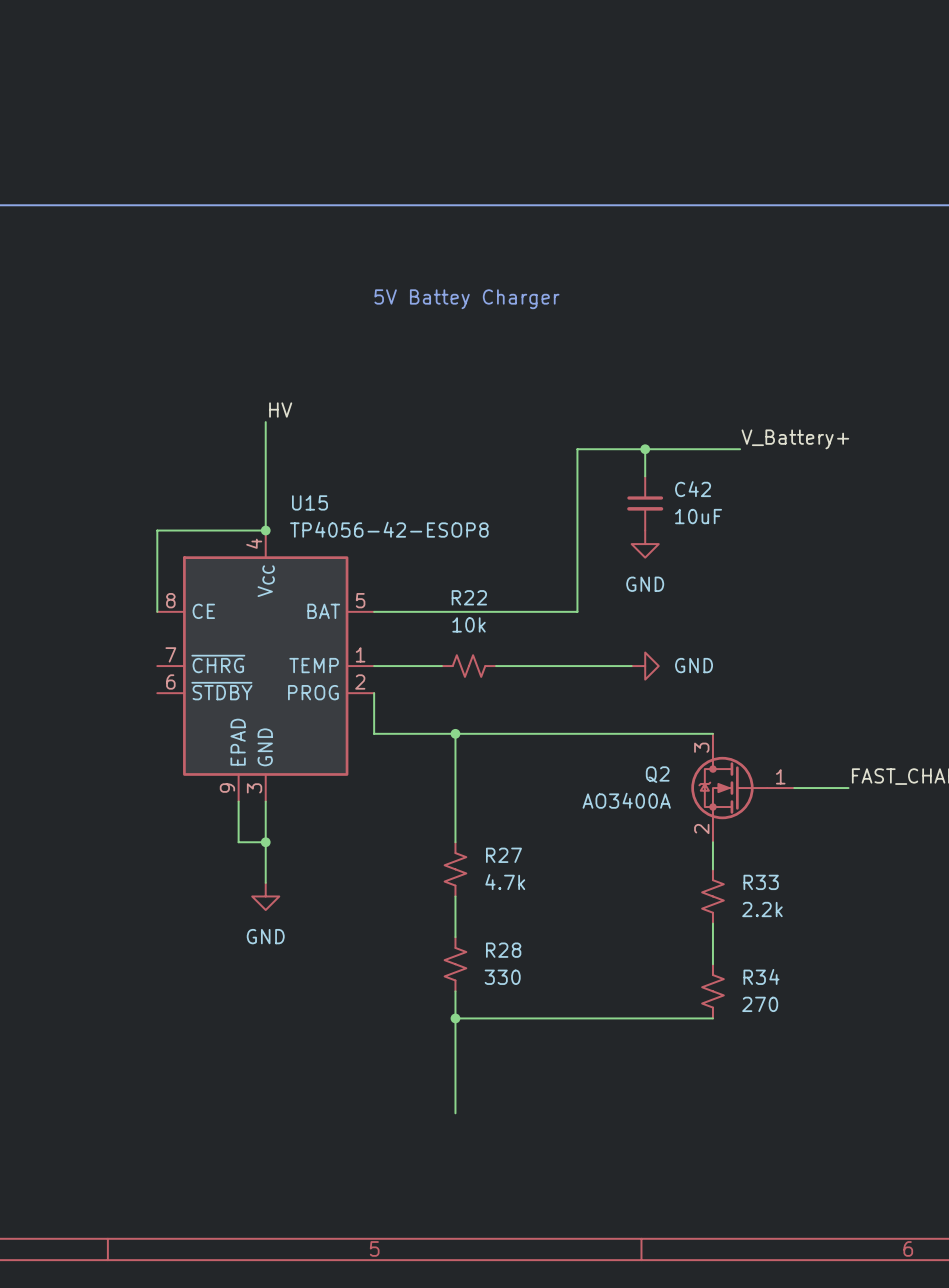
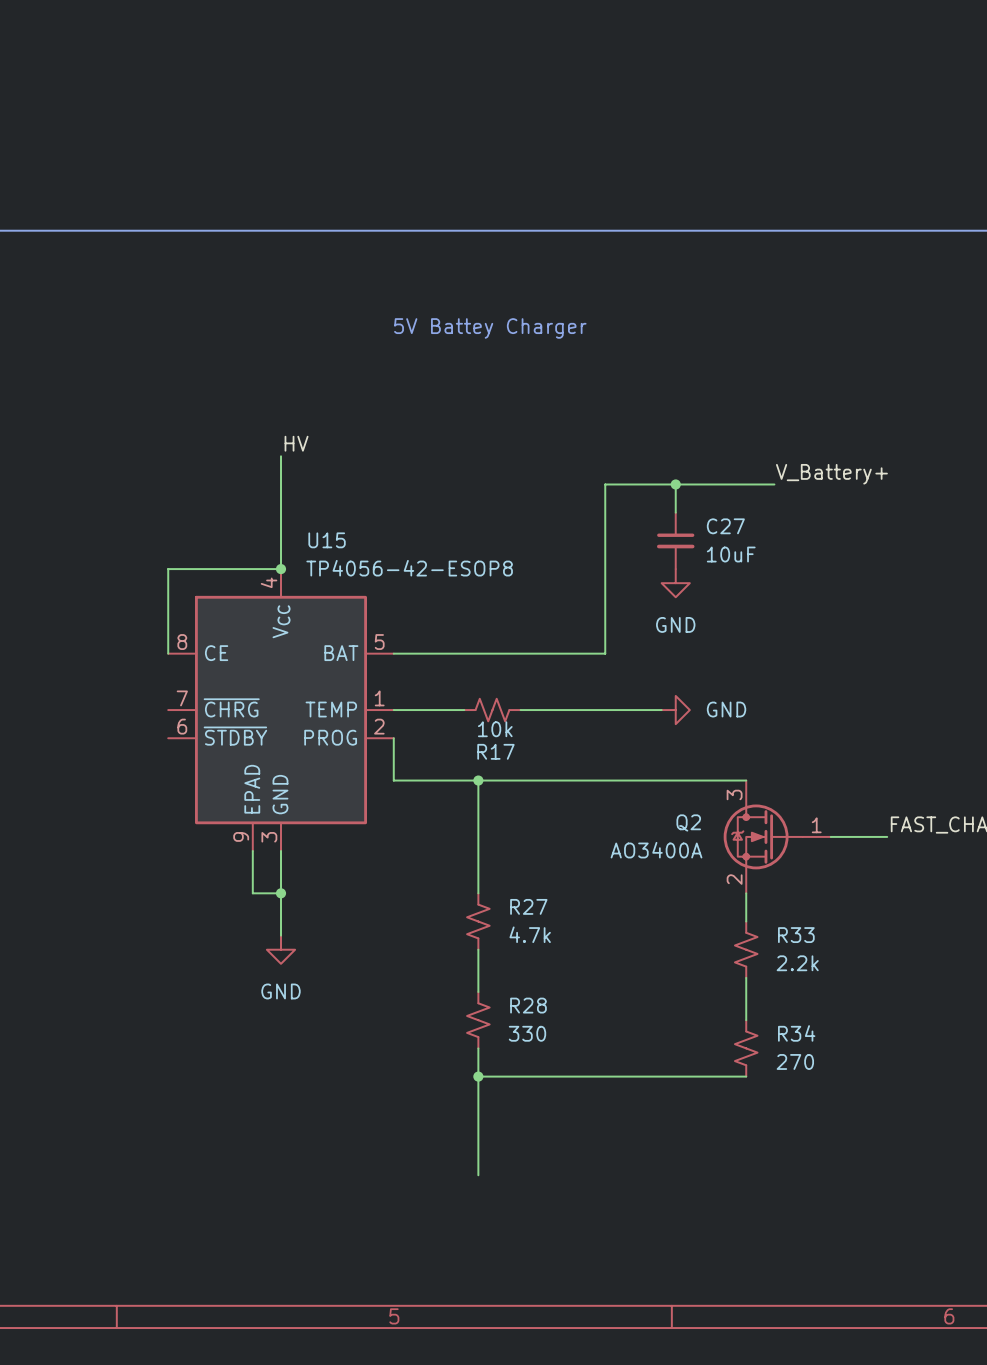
C42 name: C42 (693, 489) -> C27 (725, 526)
R22 name: R22 (469, 597) -> R17 (495, 751)
R22 value position: 10k (469, 624) -> 10k (495, 729)

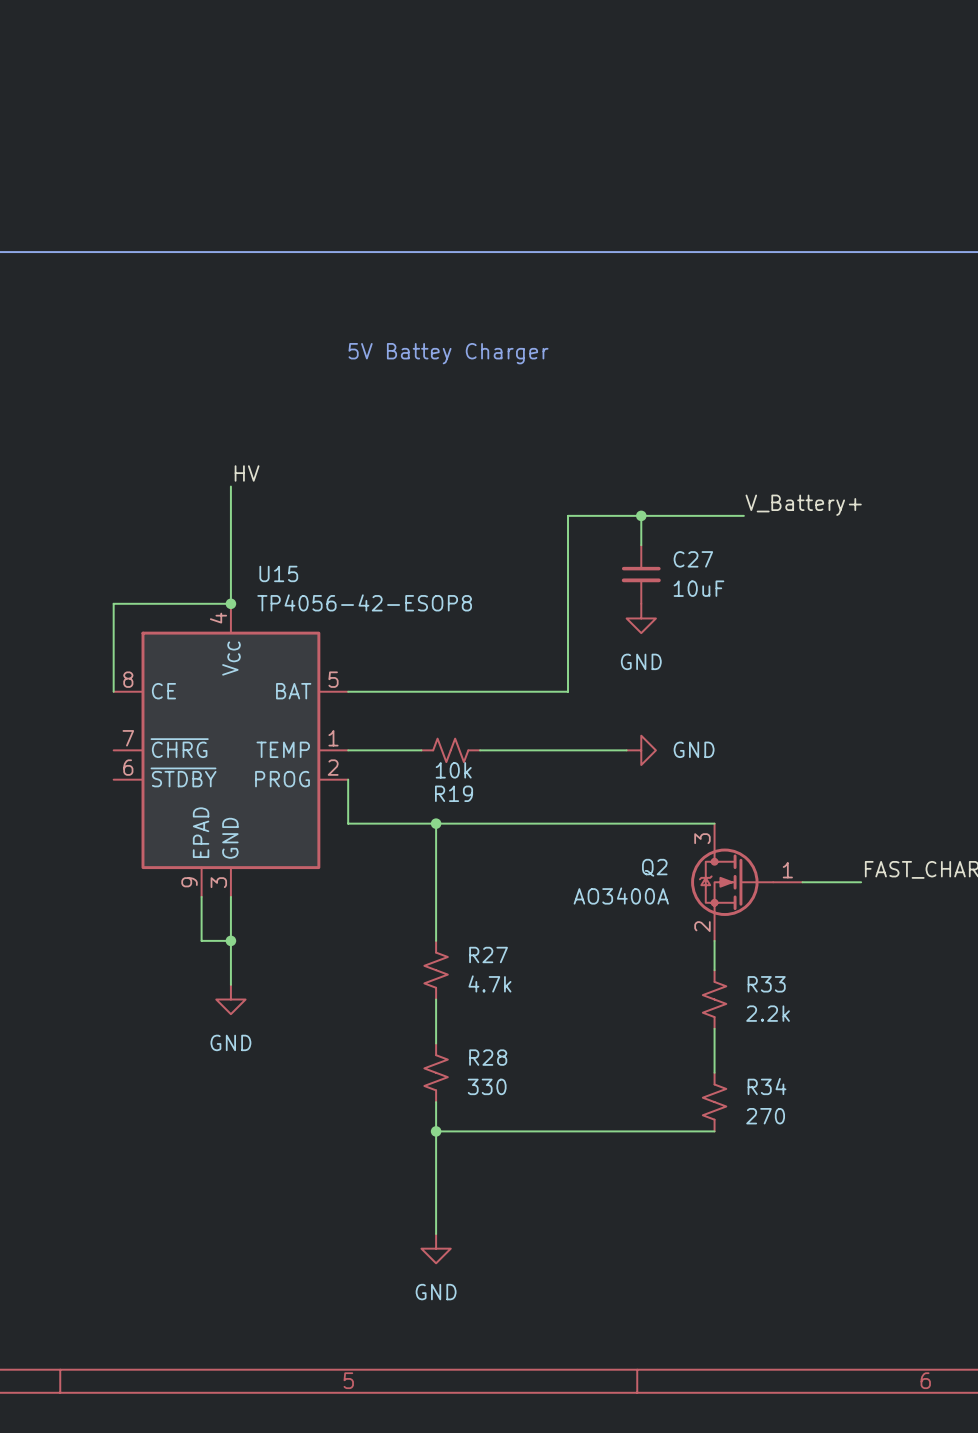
R17 name: R17 (495, 751) -> R19 (454, 793)
power symbol: none -> GND (436, 1248)

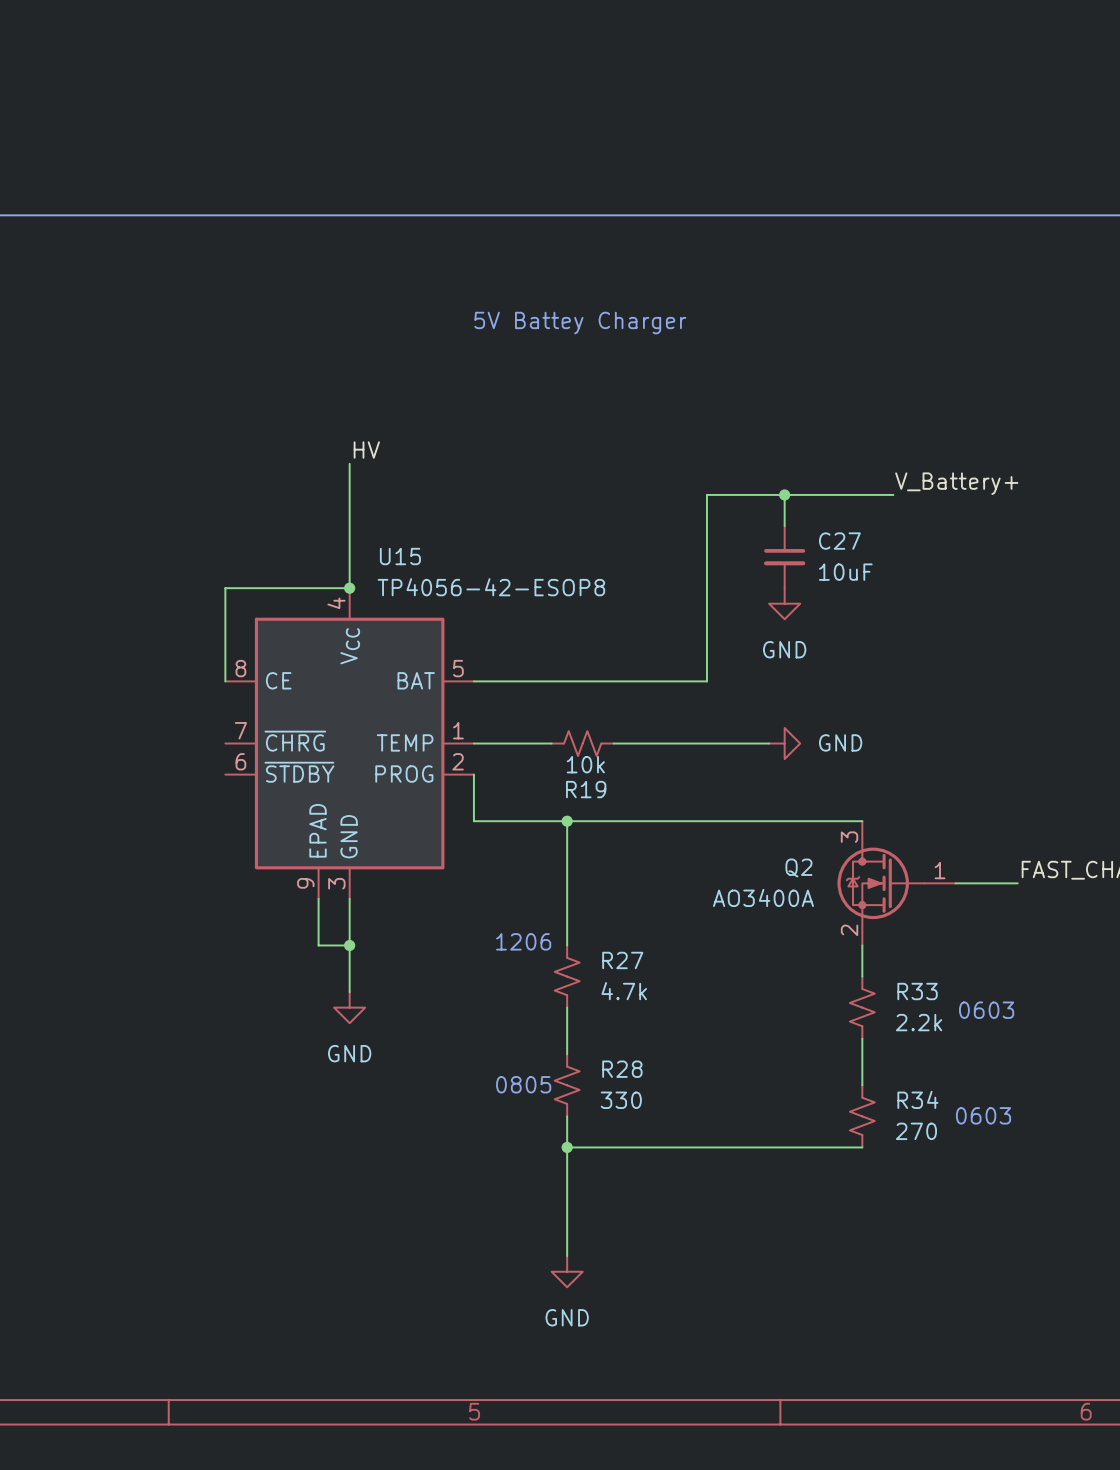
text: none -> 1206 (523, 941)
text: none -> 0603 (986, 1010)
text: none -> 0805 (523, 1084)
text: none -> 0603 (983, 1115)

